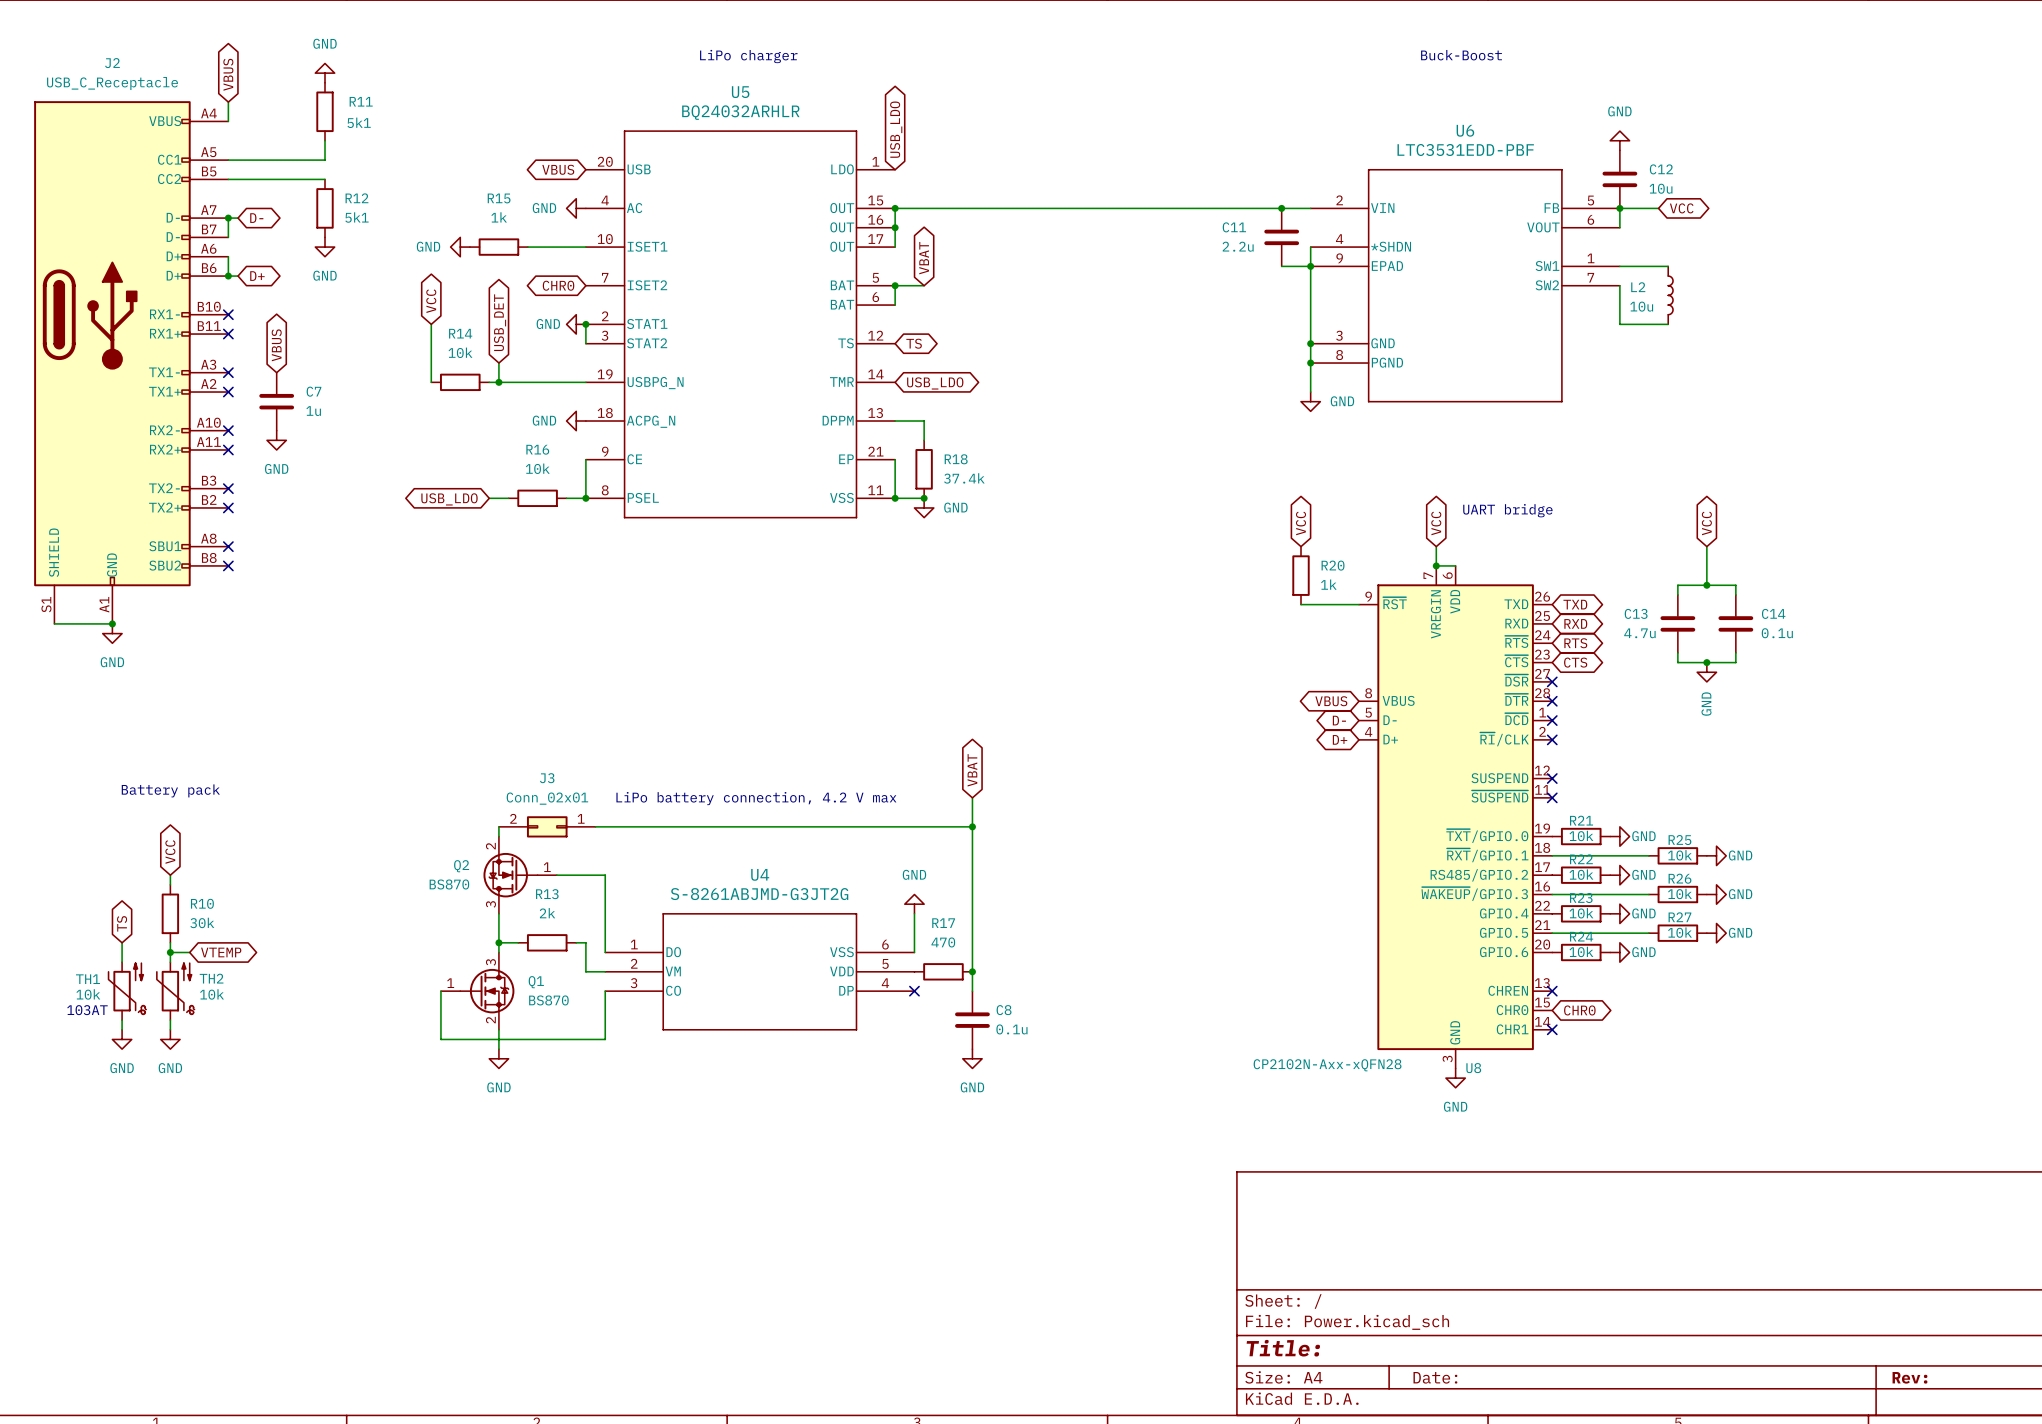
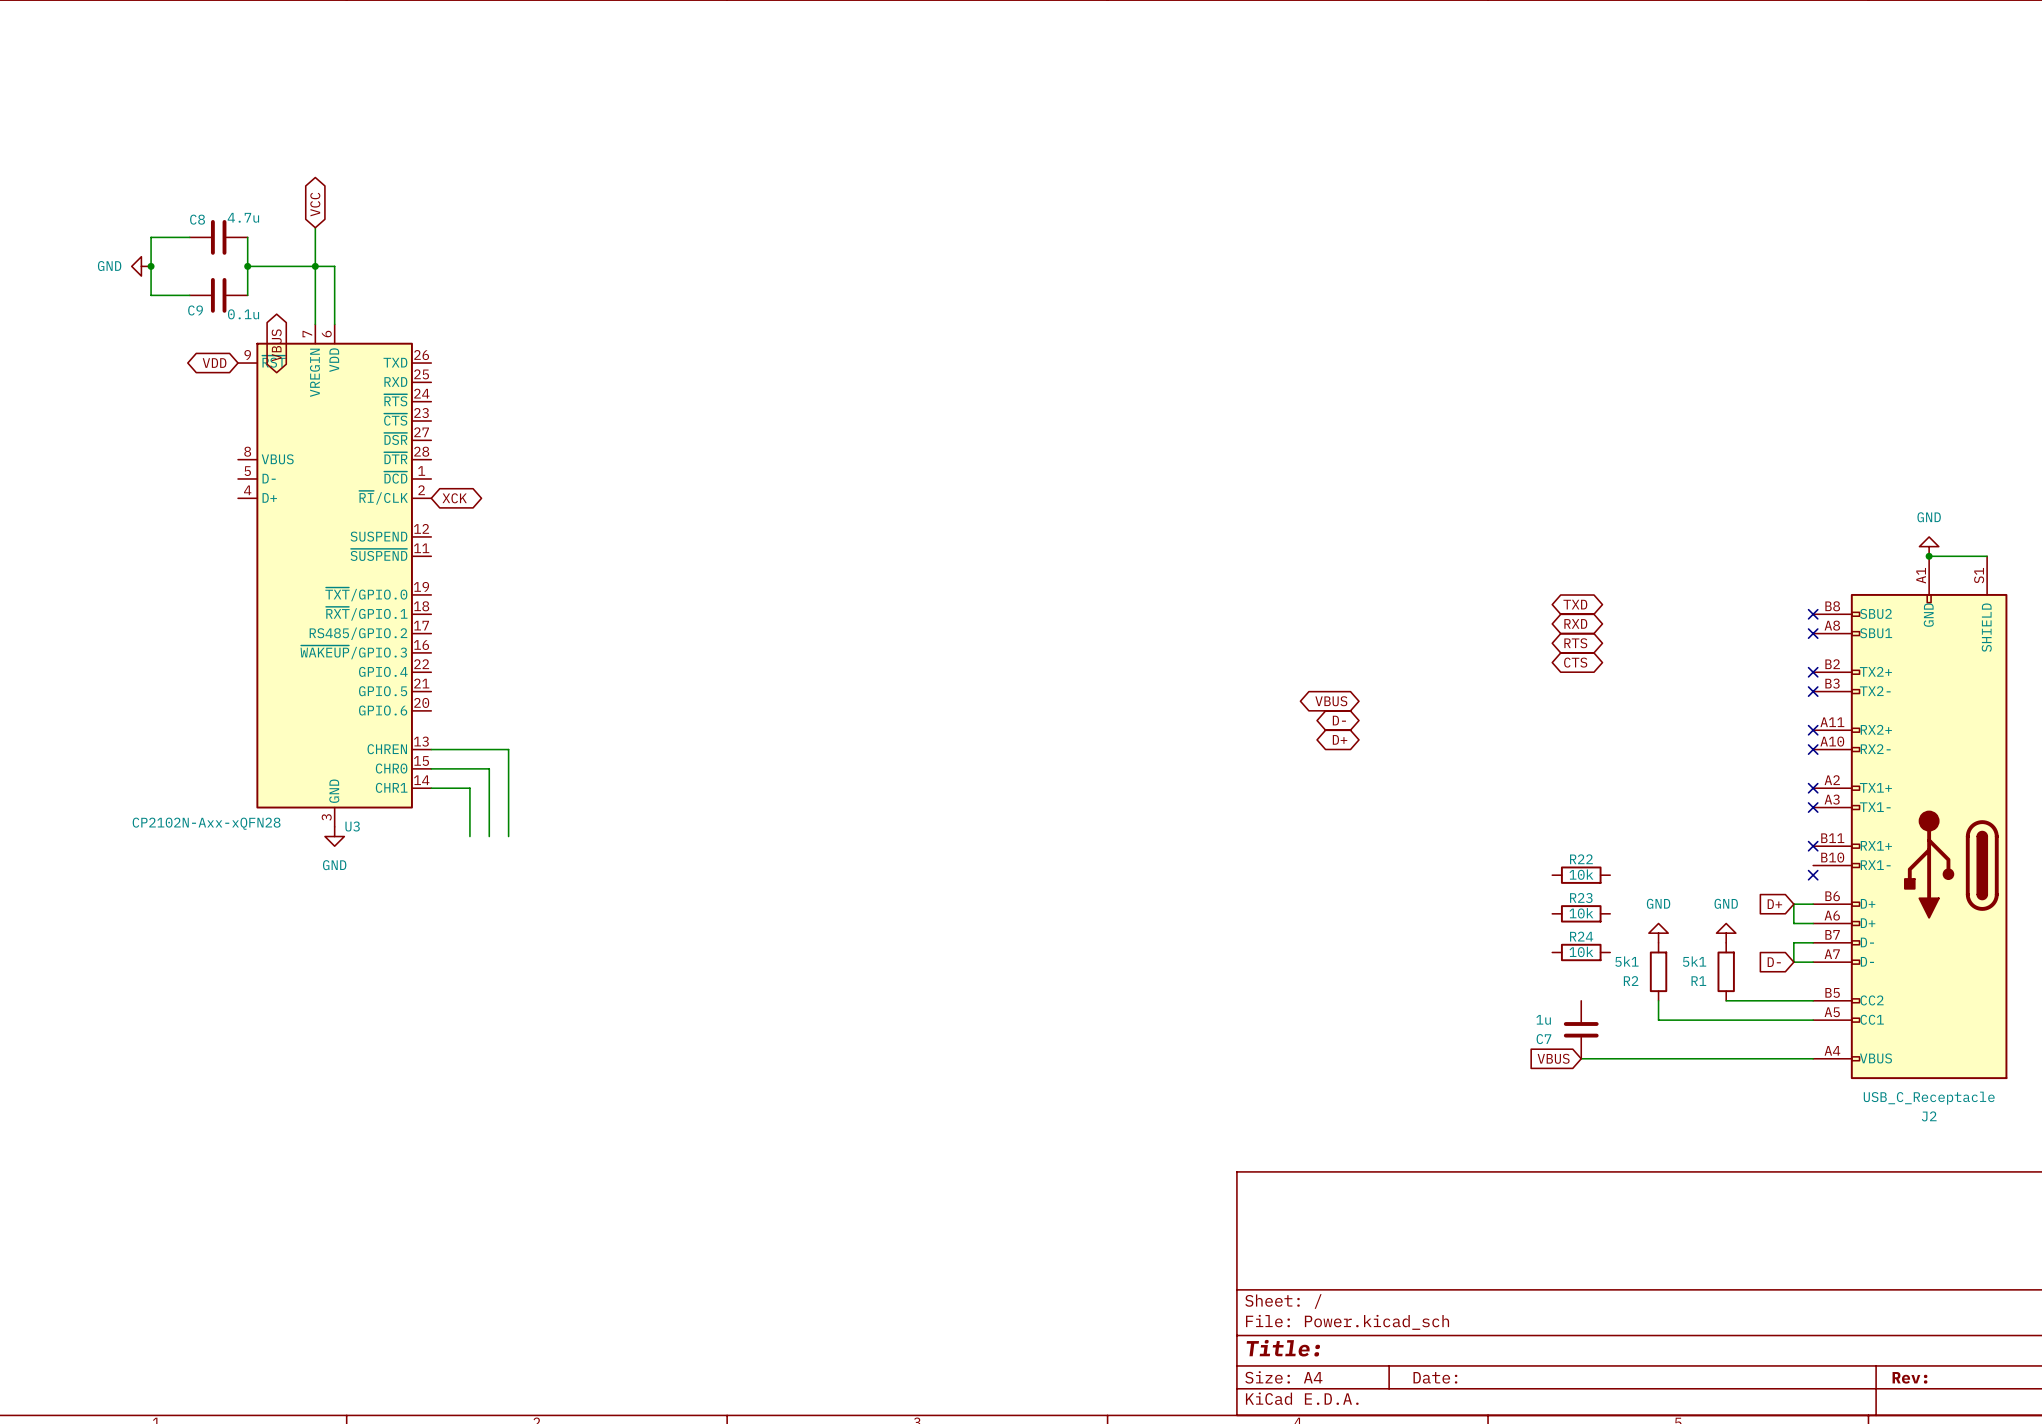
text: Buck-Boost (1461, 55) -> none
text: LiPo charger (748, 56) -> none
power symbol: GND (325, 73) -> none
global label: VBUS (228, 74) -> none
wire: (228, 102) (228, 121) -> none
R11: 5k1 (325, 111) -> none
global label: USB_LDO (896, 129) -> none
wire: (325, 140) (325, 160) (228, 160) -> none
power symbol: GND (1619, 140) -> none
global label: VBUS (558, 169) -> none
wire: (228, 179) (325, 179) -> none
C12: 10u (1619, 179) -> none
R12: 5k1 (325, 208) -> none
power symbol: GND (576, 208) -> none
junction: (895, 208) -> none
junction: (1281, 208) -> none
wire: (1310, 208) (895, 208) (895, 247) -> none
junction: (1619, 208) -> none
wire: (1658, 208) (1619, 208) (1619, 227) -> none
global label: VCC (1681, 208) -> none
junction: (228, 218) -> none
wire: (238, 218) (228, 218) (228, 237) -> none
global label: D- (256, 218) -> none
wire: none -> (315, 227) (315, 324)
junction: (895, 227) -> none
wire: none -> (247, 237) (247, 295)
C11: 2.2u (1281, 237) -> none
power symbol: GND (325, 247) -> none
power symbol: GND (460, 247) -> none
R15: 1k (498, 247) -> none
wire: (527, 247) (585, 247) -> none
wire: (1310, 247) (1310, 392) -> none
wire: (228, 256) (228, 276) (238, 276) -> none
global label: VBAT (924, 258) -> none
power symbol: none -> GND (141, 266)
junction: none -> (151, 266)
wire: none -> (247, 266) (334, 266) (334, 324)
junction: none -> (315, 266)
wire: (1281, 266) (1310, 266) -> none
junction: (1310, 266) -> none
wire: (1619, 266) (1668, 266) -> none
junction position: (228, 276) -> (247, 266)
global label: D+ (257, 276) -> none
global label: CHR0 (558, 285) -> none
junction: (895, 285) -> none
wire: (924, 285) (895, 285) (895, 305) -> none
U6: LTC3531EDD-PBF (1465, 285) -> none
wire: (1619, 285) (1619, 324) (1668, 324) -> none
C9: none -> 0.1u (218, 295)
L2: 10u (1670, 295) -> none
global label position: VCC (431, 301) -> VCC (315, 204)
no-connect mark: (228, 314) -> none
global label: USB_DET (500, 322) -> none
wire: (431, 324) (431, 382) -> none
power symbol: GND (576, 324) -> none
wire: (585, 324) (585, 343) -> none
junction: (585, 324) -> none
U5: BQ24032ARHLR (740, 324) -> none
no-connect mark: (228, 334) -> none
J2 rotation: 0° (112, 343) -> 180° (1929, 836)
global label: TS (914, 343) -> none
junction: (1310, 343) -> none
J2 position: (131, 362) -> (1910, 817)
global label: none -> VDD (214, 363)
wire: (498, 363) (498, 382) -> none
junction: (1310, 363) -> none
no-connect mark: (228, 372) -> none
R14: 10k (460, 382) -> none
wire: (489, 382) (585, 382) -> none
junction: (498, 382) -> none
global label: USB_LDO (935, 383) -> none
C7 name position: C7 (313, 391) -> C7 (1543, 1039)
no-connect mark: (228, 392) -> none
C7 position: (276, 401) -> (1581, 1029)
power symbol: GND (1310, 401) -> none
C7 value position: 1u (313, 411) -> 1u (1543, 1019)
power symbol: GND (576, 421) -> none
wire: (895, 421) (924, 421) (924, 440) -> none
no-connect mark: (228, 430) -> none
power symbol: GND (276, 440) -> none
no-connect mark: (228, 449) -> none
wire: (585, 459) (585, 498) (566, 498) -> none
wire: (895, 459) (895, 498) (924, 498) -> none
R18: 37.4k (924, 469) -> none
no-connect mark: (228, 488) -> none
global label: none -> XCK (454, 498)
wire: (489, 498) (508, 498) -> none
R16: 10k (537, 498) -> none
junction: (585, 498) -> none
junction: (895, 498) -> none
junction: (924, 498) -> none
global label: USB_LDO (449, 499) -> none
no-connect mark: (228, 507) -> none
power symbol: GND (924, 507) -> none
text: UART bridge (1507, 510) -> none
global label: VCC (1301, 523) -> none
global label: VCC (1436, 523) -> none
global label: VCC (1706, 523) -> none
no-connect mark: (228, 546) -> none
wire: (1436, 546) (1436, 565) (1455, 565) -> none
wire: (1706, 546) (1706, 585) -> none
power symbol: none -> GND (1929, 546)
wire: none -> (1929, 556) (1987, 556)
junction: none -> (1929, 556)
no-connect mark: (228, 565) -> none
junction: (1436, 565) -> none
U3: none -> CP2102N-Axx-xQFN28 (334, 575)
R20: 1k (1301, 575) -> none
junction: (1706, 585) -> none
wire: (1677, 594) (1677, 585) (1735, 585) (1735, 594) -> none
wire: (1301, 604) (1358, 604) -> none
no-connect mark: none -> (1813, 614)
wire: (54, 623) (112, 623) -> none
junction: (112, 623) -> none
C13: 4.7u (1677, 623) -> none
C14: 0.1u (1735, 623) -> none
power symbol: GND (112, 633) -> none
no-connect mark: none -> (1813, 633)
wire: (1677, 652) (1677, 662) (1735, 662) (1735, 652) -> none
junction: (1706, 662) -> none
power symbol: GND (1706, 672) -> none
no-connect mark: none -> (1813, 672)
no-connect mark: (1552, 681) -> none
no-connect mark: none -> (1813, 691)
no-connect mark: (1552, 701) -> none
no-connect mark: (1552, 720) -> none
no-connect mark: none -> (1813, 730)
no-connect mark: (1552, 739) -> none
wire: none -> (431, 749) (508, 749) (508, 836)
no-connect mark: none -> (1813, 749)
wire: none -> (431, 768) (489, 768) (489, 836)
global label: VBAT (972, 770) -> none
no-connect mark: (1552, 778) -> none
wire: none -> (431, 788) (469, 788) (469, 836)
no-connect mark: none -> (1813, 788)
text: Battery pack (170, 790) -> none
wire: (972, 797) (972, 991) -> none
no-connect mark: (1552, 797) -> none
text: LiPo battery connection, 4.2 V max (756, 798) -> none
no-connect mark: none -> (1813, 807)
U8: CP2102N-Axx-xQFN28 (1455, 817) -> none
wire: (498, 826) (498, 836) -> none
J3: Conn_02x01 (547, 826) -> none
wire: (595, 826) (972, 826) -> none
junction: (972, 826) -> none
power symbol: none -> GND (334, 836)
R21: 10k (1581, 836) -> none
power symbol: GND (1619, 836) -> none
no-connect mark: none -> (1813, 846)
global label: VCC (170, 852) -> none
wire: (1552, 855) (1648, 855) -> none
R25: 10k (1677, 855) -> none
power symbol: GND (1716, 855) -> none
wire: (170, 875) (170, 884) -> none
Q2: BS870 (520, 875) -> none
wire: (556, 875) (605, 875) (605, 952) -> none
power symbol: GND (1619, 875) -> none
no-connect mark: none -> (1813, 875)
wire: (1552, 894) (1648, 894) -> none
R26: 10k (1677, 894) -> none
power symbol: GND (1716, 894) -> none
power symbol: GND (914, 904) -> none
global label: none -> D+ (1774, 904)
wire: none -> (1813, 904) (1793, 904) (1793, 923) (1813, 923)
R10: 30k (170, 913) -> none
wire: (498, 913) (498, 952) -> none
wire: (914, 913) (914, 952) -> none
power symbol: GND (1619, 913) -> none
global label: TS (122, 923) -> none
wire: (1552, 933) (1648, 933) -> none
power symbol: none -> GND (1658, 933)
R27: 10k (1677, 933) -> none
power symbol rotation: 0° (1716, 933) -> 90° counterclockwise (1726, 933)
wire: (122, 942) (122, 962) -> none
wire: (170, 942) (170, 962) -> none
wire: (498, 942) (518, 942) -> none
junction: (498, 942) -> none
R13: 2k (547, 942) -> none
wire: (576, 942) (585, 942) (585, 971) (605, 971) -> none
wire: none -> (1813, 942) (1793, 942) (1793, 962) (1813, 962)
wire: (170, 952) (189, 952) -> none
junction: (170, 952) -> none
global label: VTEMP (221, 952) -> none
power symbol: GND (1619, 952) -> none
global label: none -> D- (1774, 962)
U4: S-8261ABJMD-G3JT2G (759, 971) -> none
R17: 470 (943, 971) -> none
junction: (972, 971) -> none
R2: none -> 5k1 (1658, 971)
R1: none -> 5k1 (1726, 971)
TH1: 10k (127, 991) -> none
TH2: 10k (175, 991) -> none
wire: (440, 991) (440, 1039) (605, 1039) (605, 991) -> none
Q1: BS870 (477, 991) -> none
no-connect mark: (914, 991) -> none
no-connect mark: (1552, 991) -> none
wire: none -> (1658, 1000) (1658, 1020) (1813, 1020)
wire: none -> (1726, 1000) (1813, 1000)
text: 103AT (87, 1010) -> none
C8 name position: C8 (1004, 1010) -> C8 (197, 219)
global label: CHR0 (1579, 1010) -> none
wire: (122, 1020) (122, 1029) -> none
wire: (170, 1020) (170, 1029) -> none
C8 rotation: 0° (972, 1020) -> 90° clockwise (218, 237)
C8 position: (972, 1020) -> (218, 237)
wire: (498, 1029) (498, 1049) -> none
C8 value: 0.1u (1011, 1029) -> 4.7u (243, 217)
no-connect mark: (1552, 1029) -> none
power symbol: GND (122, 1039) -> none
power symbol: GND (170, 1039) -> none
power symbol: GND (498, 1058) -> none
power symbol: GND (972, 1058) -> none
global label: none -> VBUS (1553, 1058)
wire: none -> (1581, 1058) (1813, 1058)
power symbol: GND (1455, 1078) -> none

